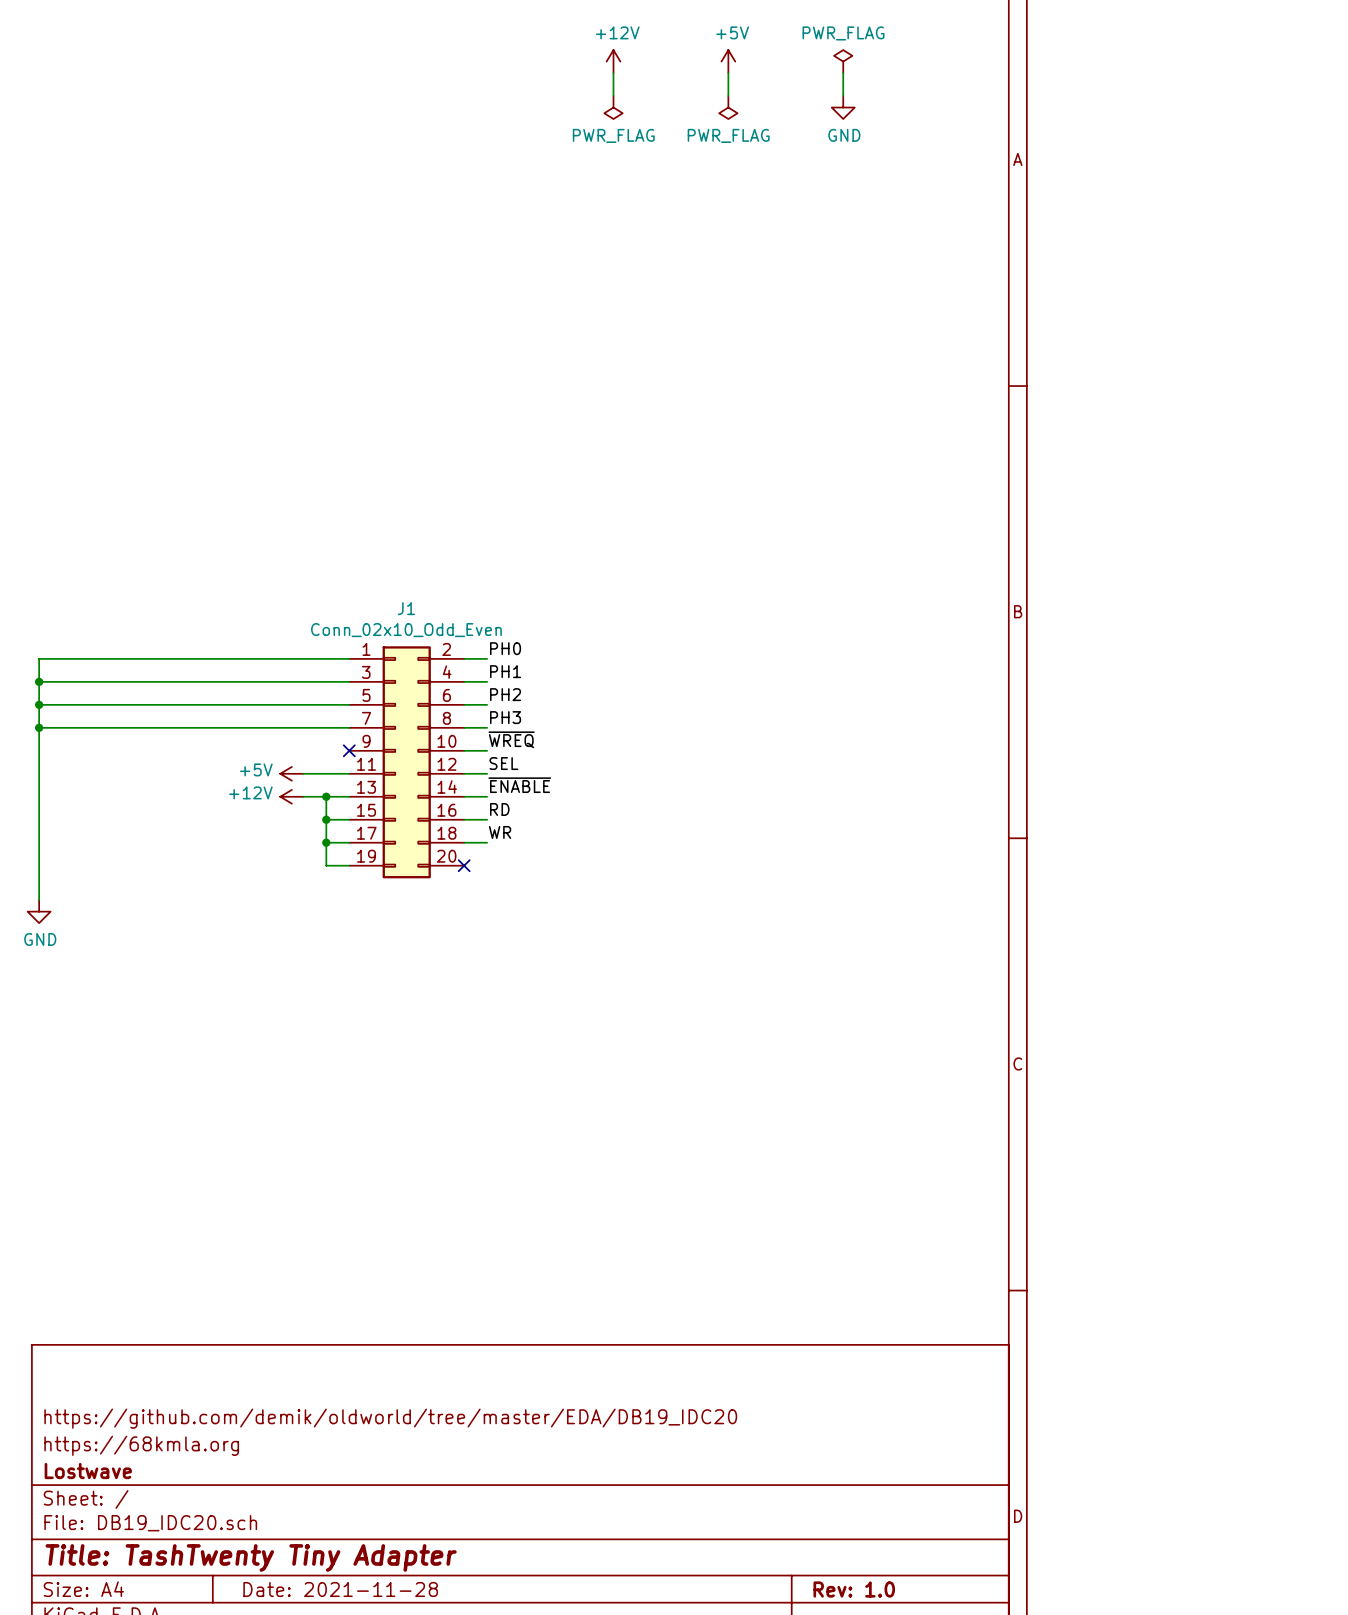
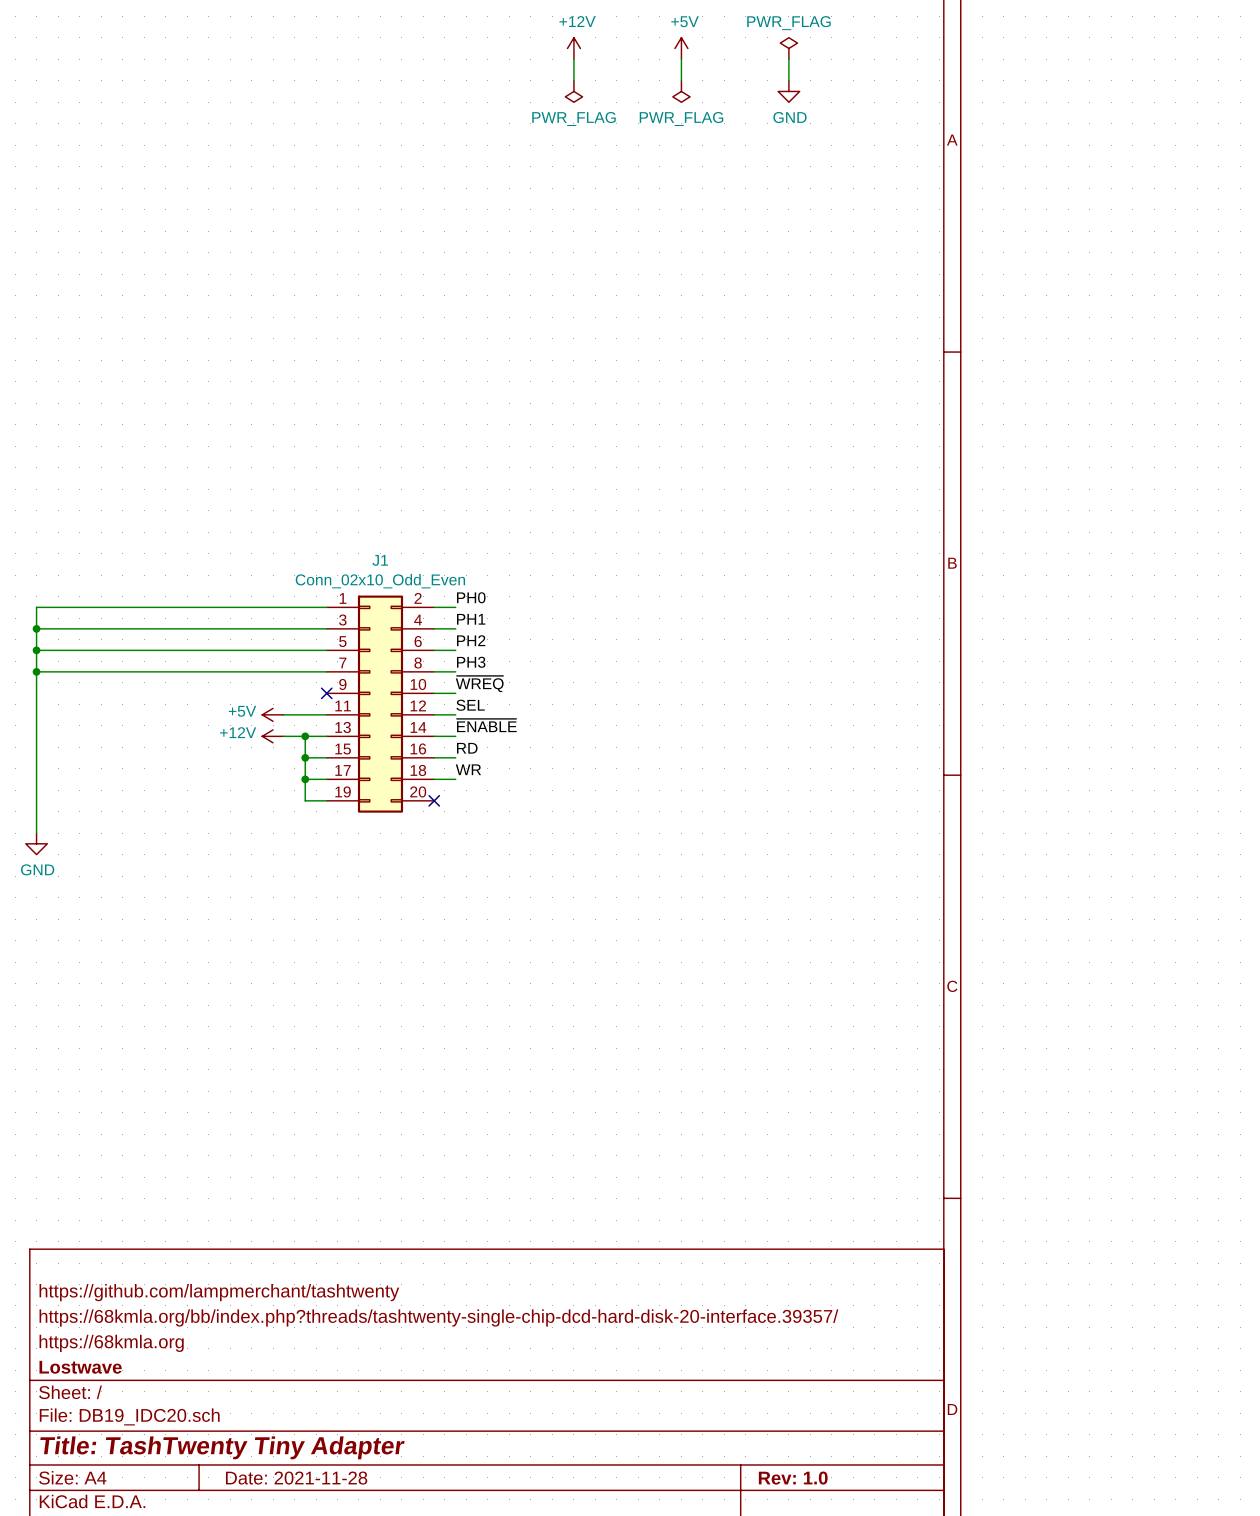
title block: none -> https://github.com/lampmerchant/tashtwenty (219, 1292)
title block: https://github.com/demik/oldworld/tree/master/EDA/DB19_IDC20 (390, 1418) -> https://68kmla.org/bb/index.php?threads/tashtwenty-single-chip-dcd-hard-disk-20-interface.39357/ (438, 1317)

